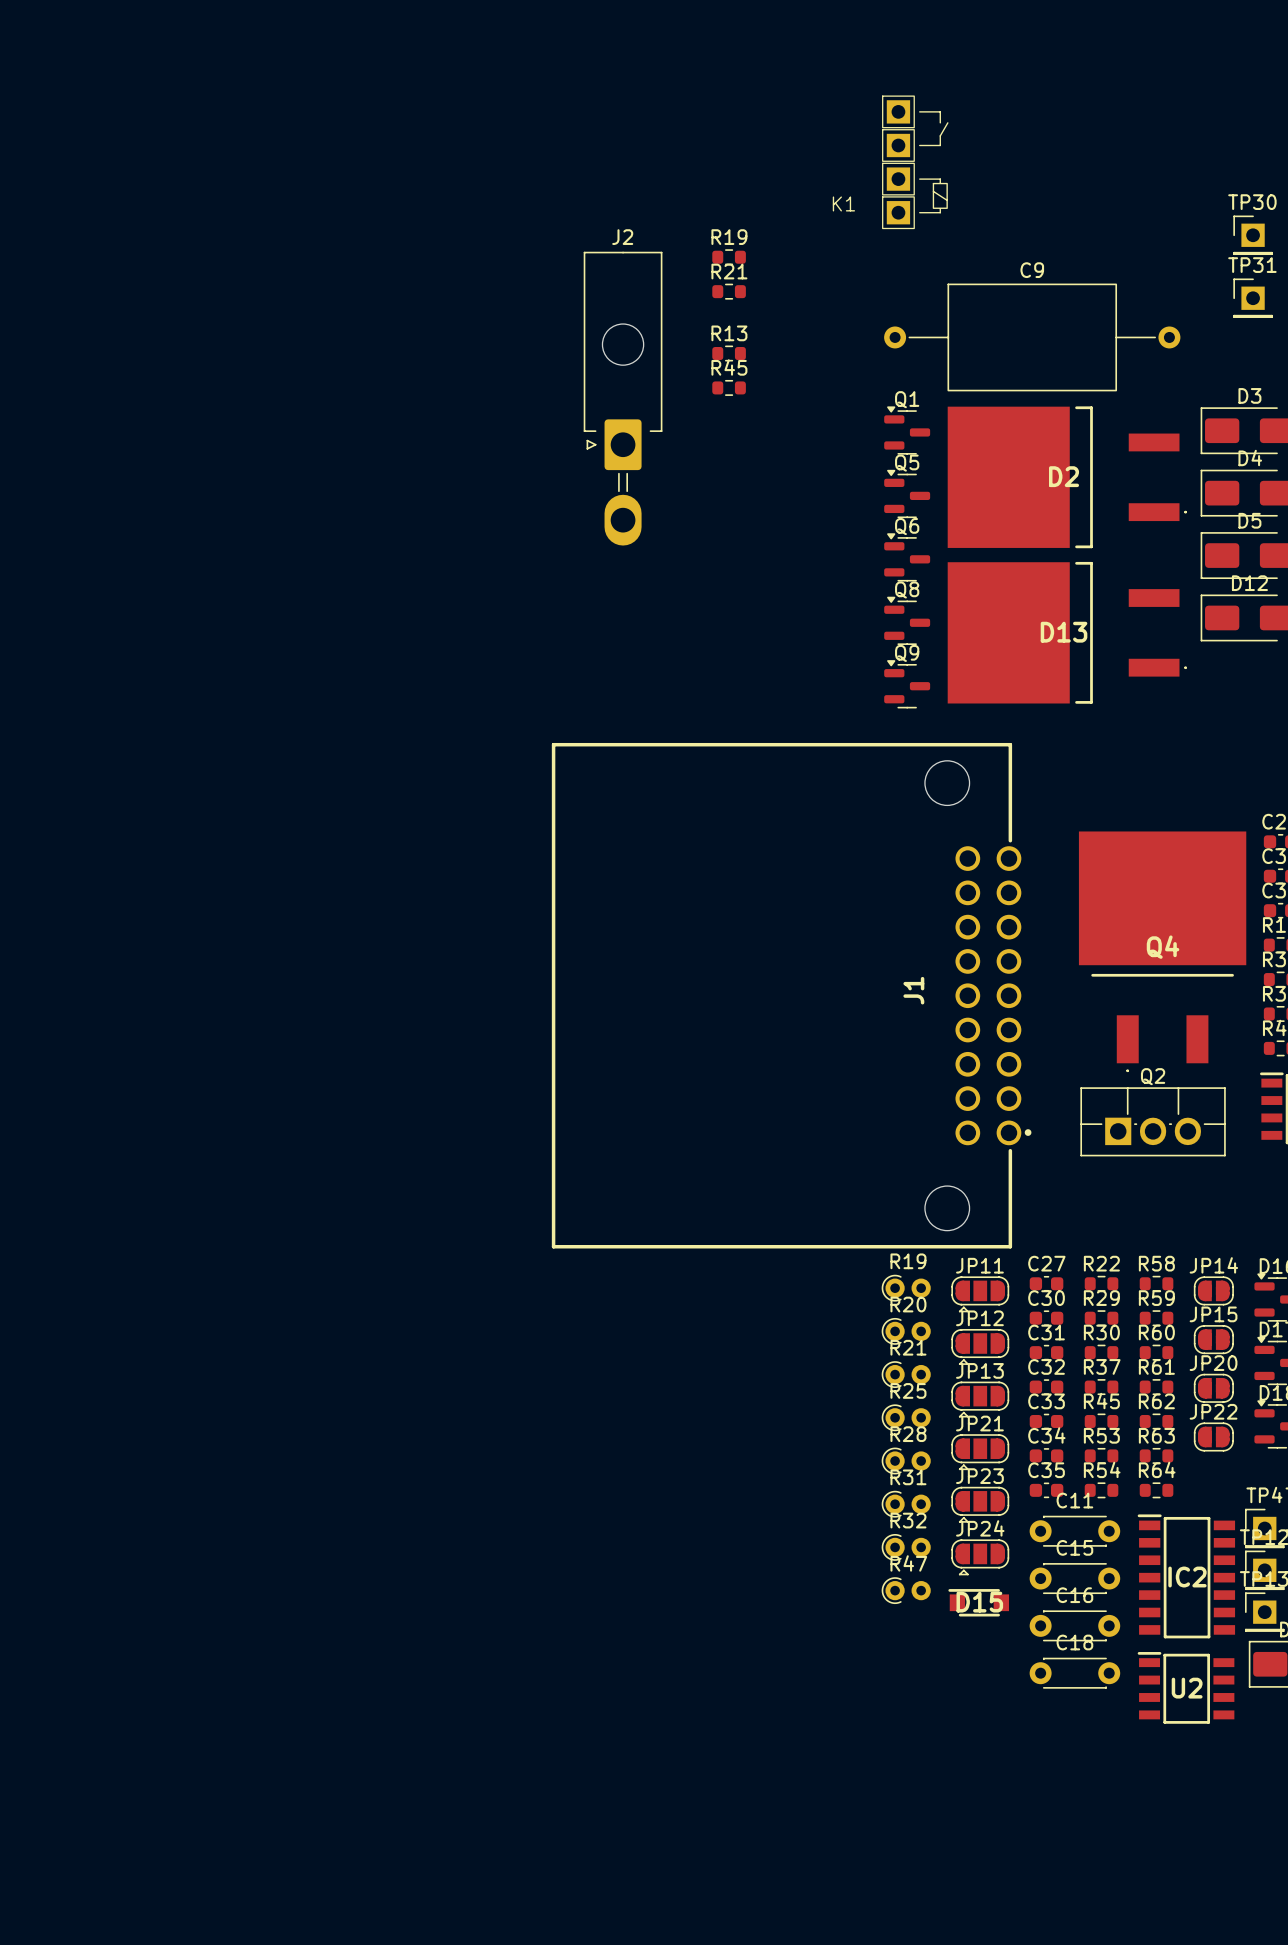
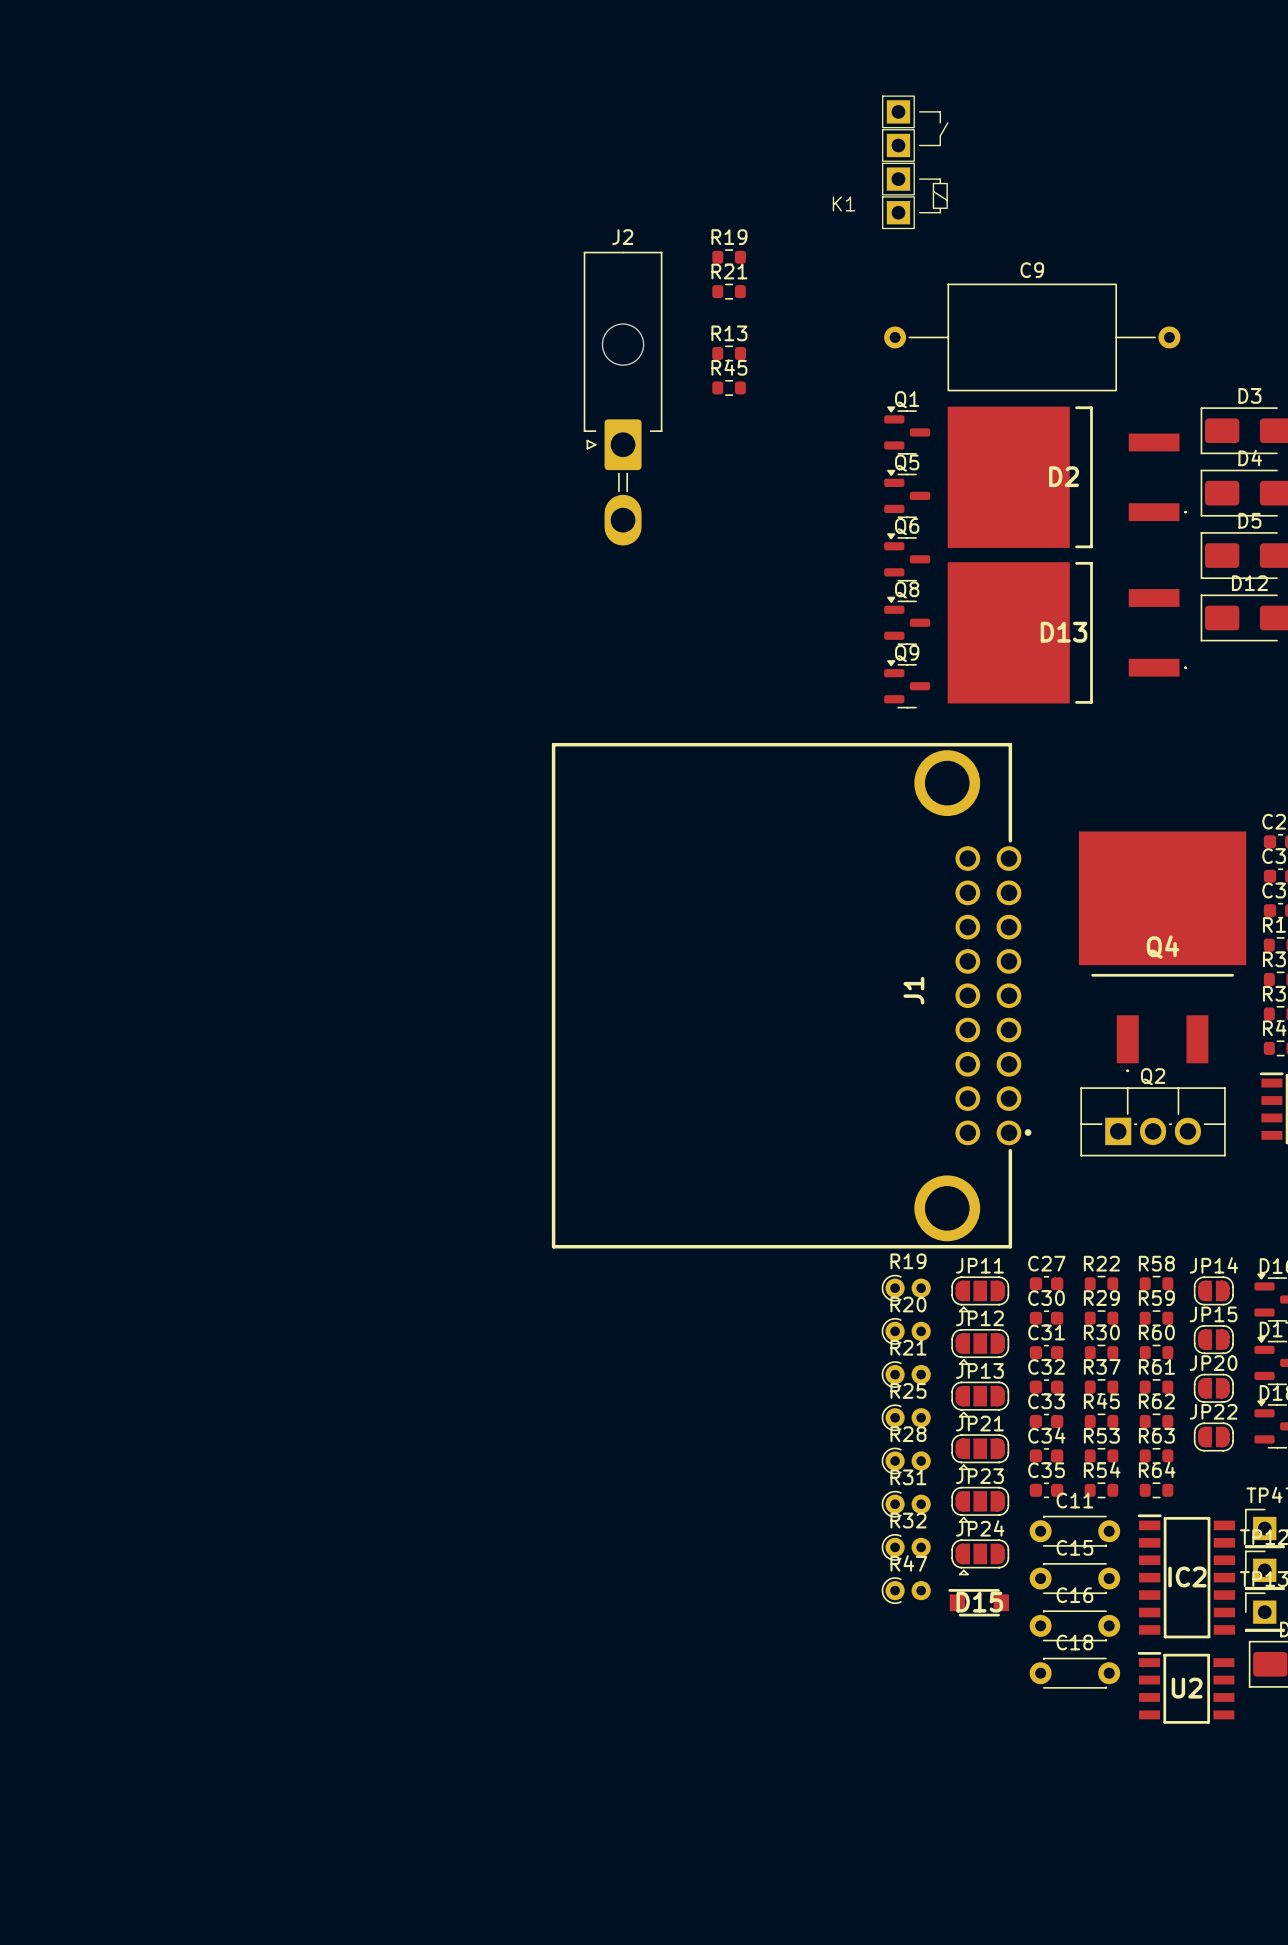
TP30: (1253, 235) -> none
TP31: (1253, 298) -> none
J1 footprint: [551, 742, 1032, 1249] -> [551, 742, 1032, 1249]

